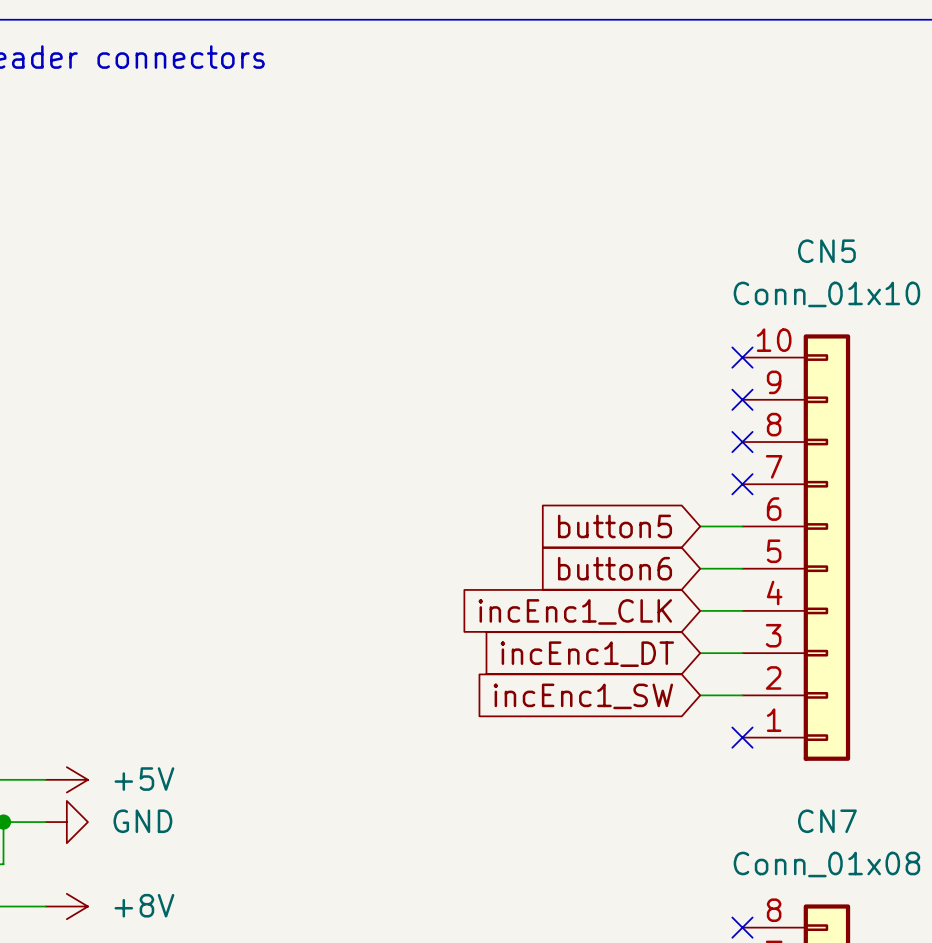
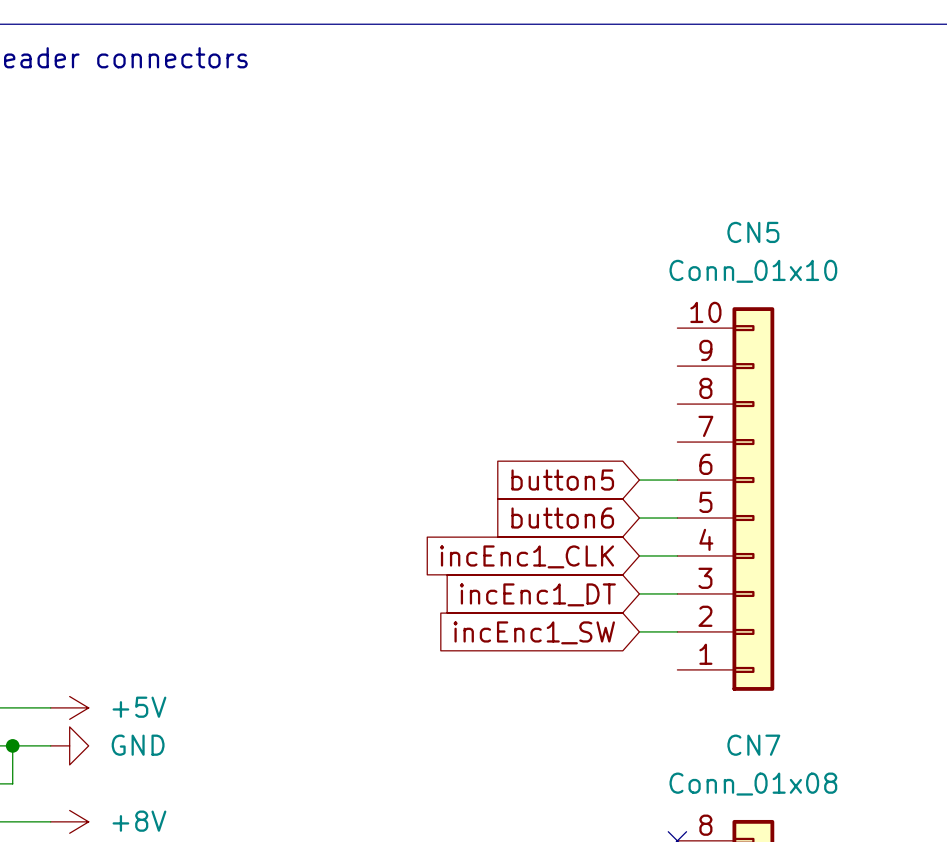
no-connect mark: (742, 357) -> none
no-connect mark: (742, 399) -> none
no-connect mark: (742, 442) -> none
no-connect mark: (742, 484) -> none
no-connect mark: (742, 737) -> none

